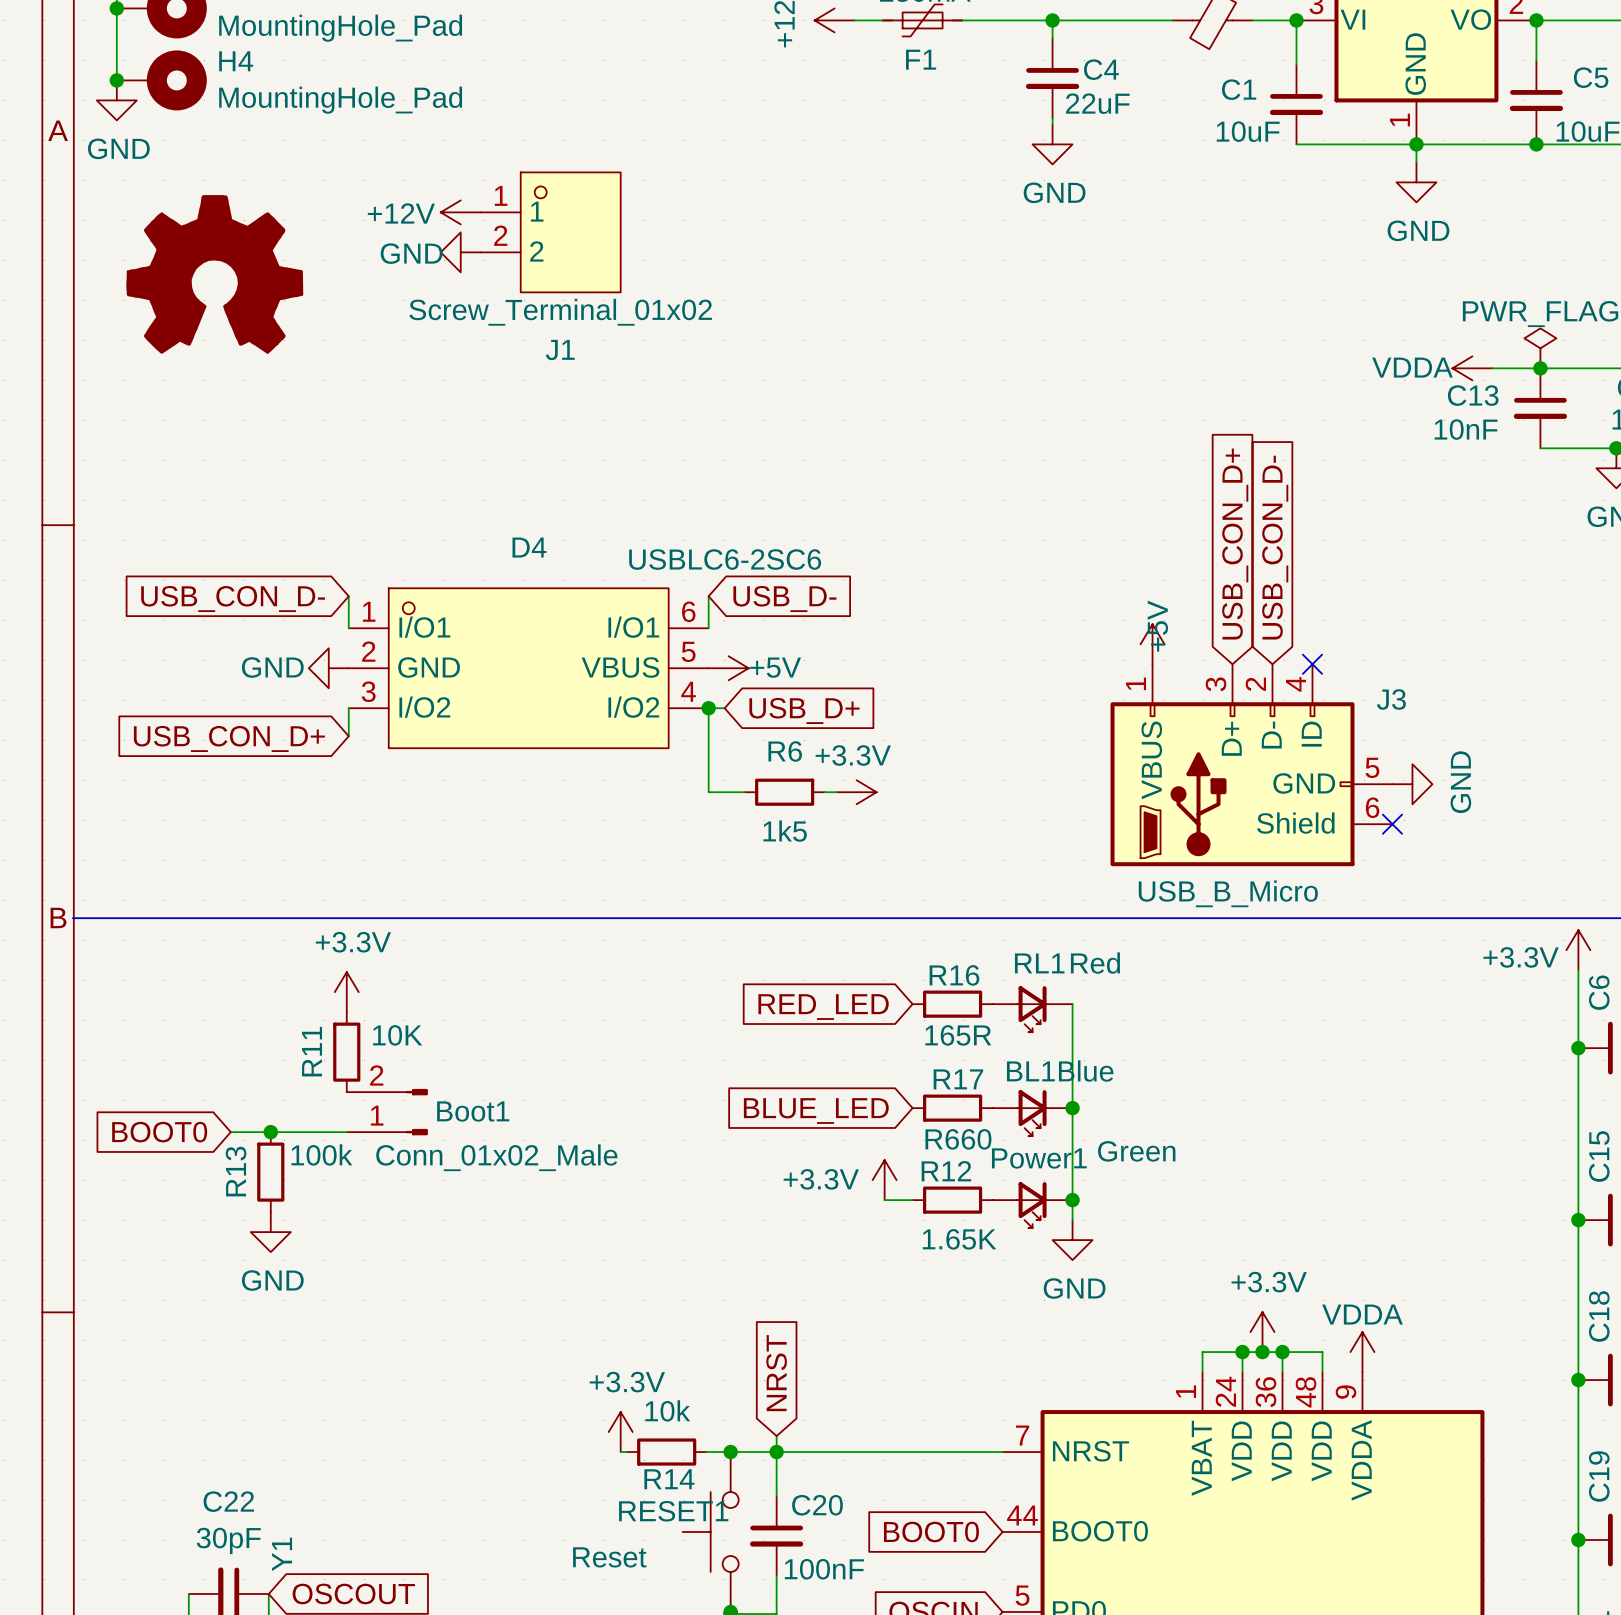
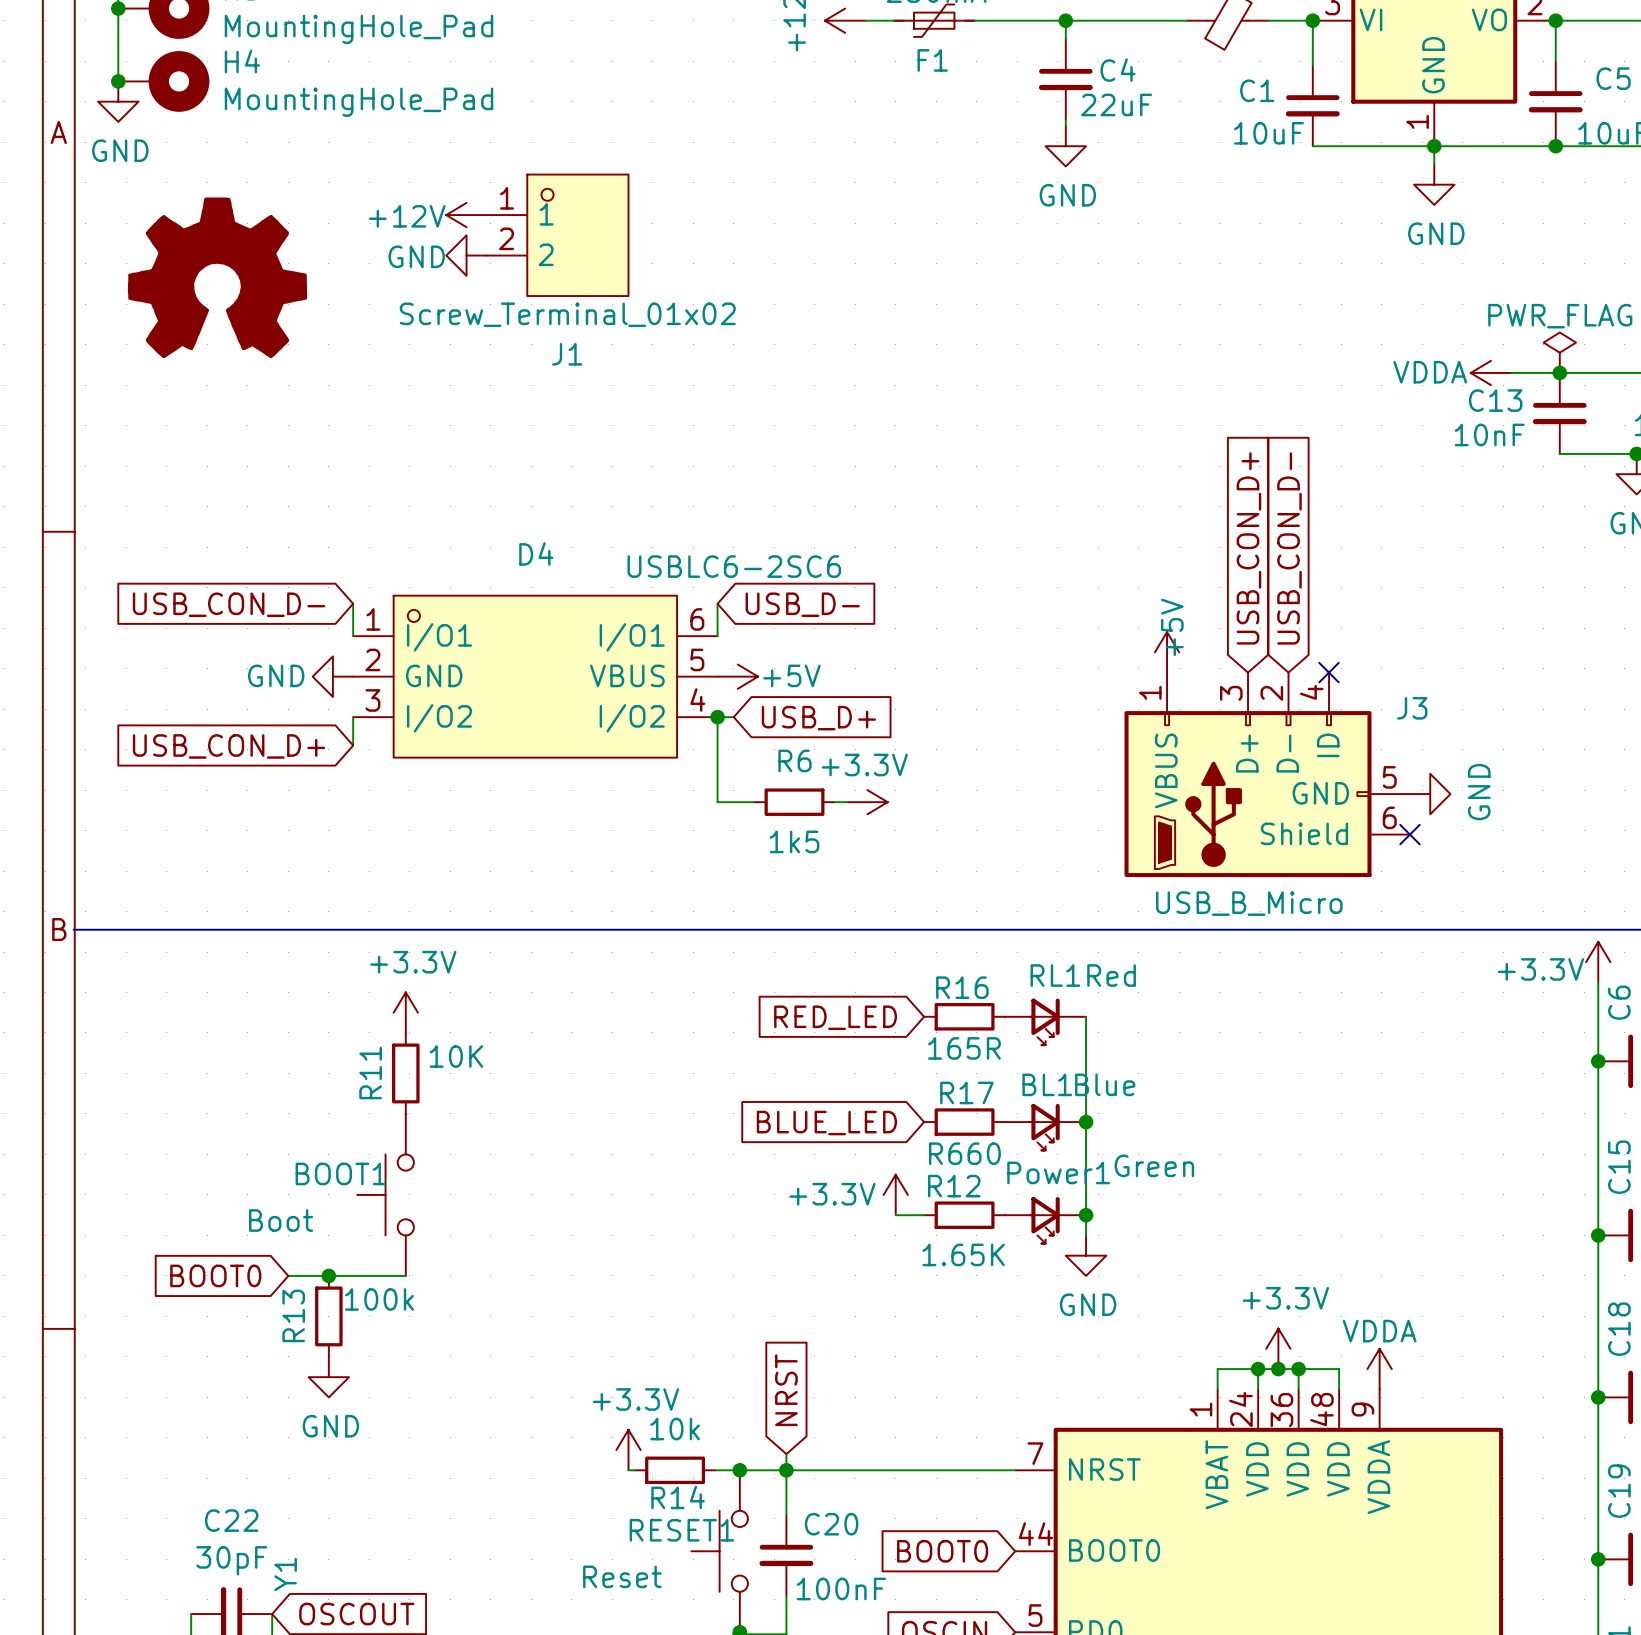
power symbol position: +3.3V (346, 992) -> +3.3V (405, 1012)
R11 position: (346, 1052) -> (405, 1073)
Boot1: Conn_01x02_Male (387, 1112) -> none
global label position: BOOT0 (159, 1132) -> BOOT0 (215, 1275)
wire: (230, 1132) (346, 1132) -> (288, 1275) (405, 1275)
junction: (270, 1132) -> none
R13 position: (270, 1172) -> (328, 1316)
BOOT1: none -> Boot (385, 1194)
power symbol position: GND (270, 1232) -> GND (328, 1377)
junction: none -> (328, 1275)

